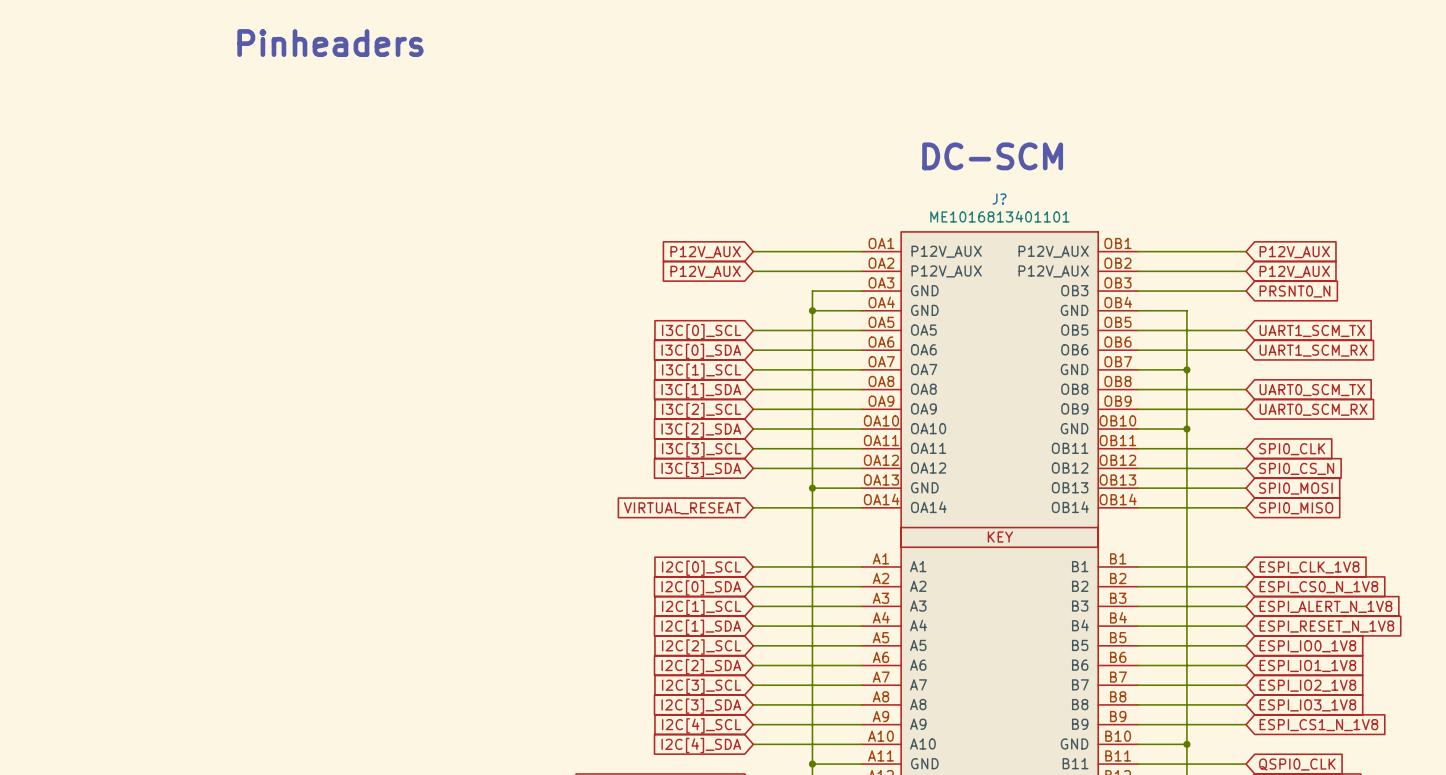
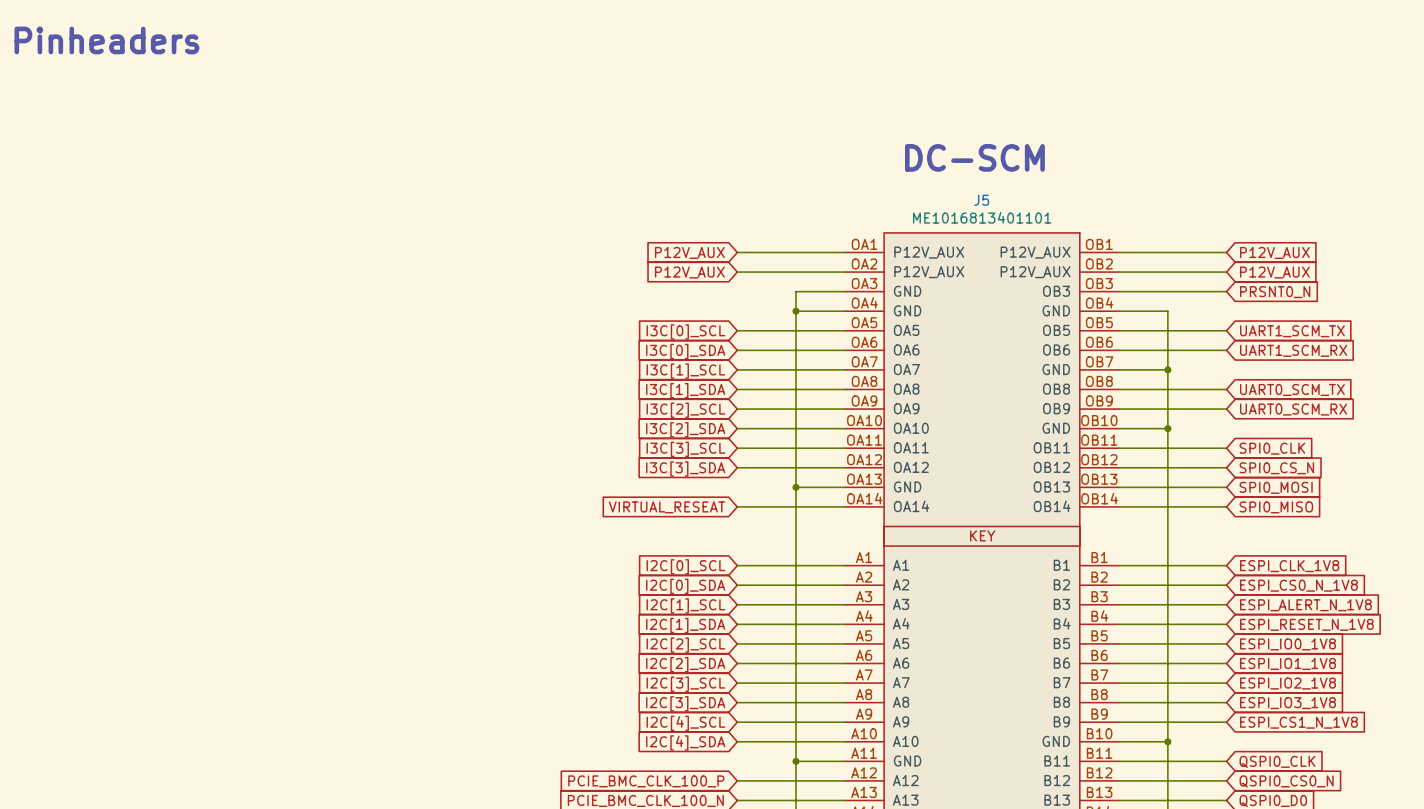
text: none -> Pinheaders (106, 40)
text: Pinheaders (330, 43) -> none
J? name: J? (999, 199) -> J5 (981, 200)

